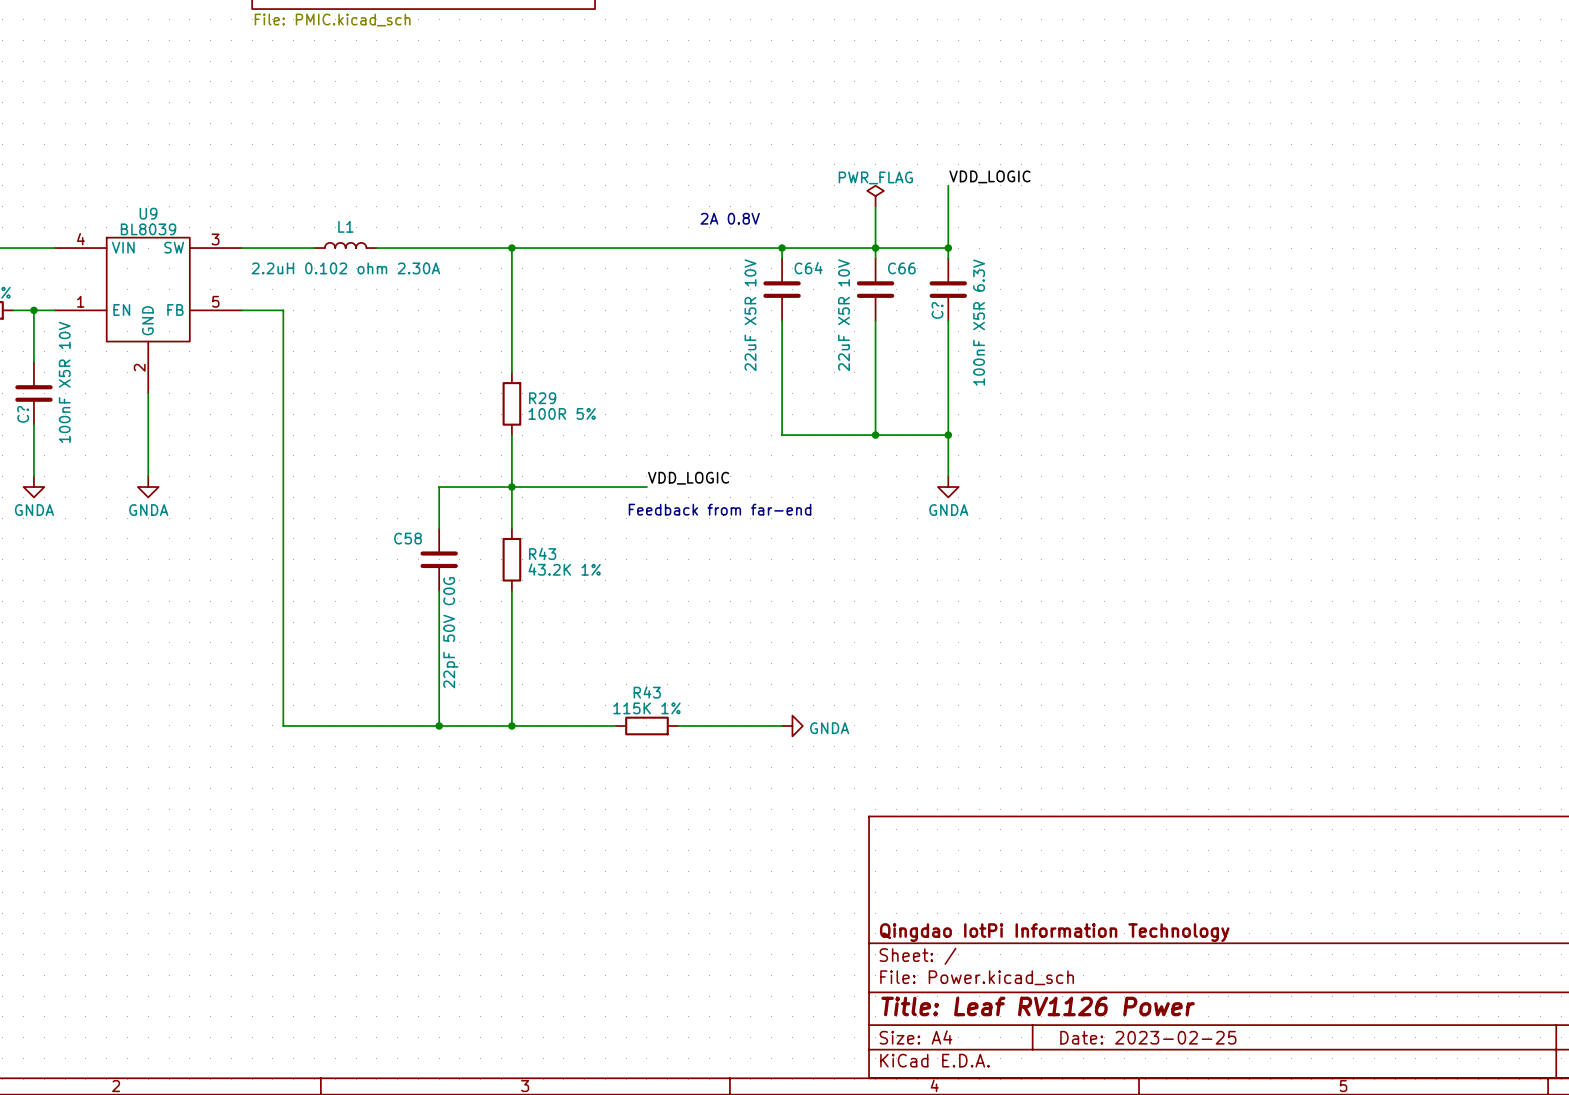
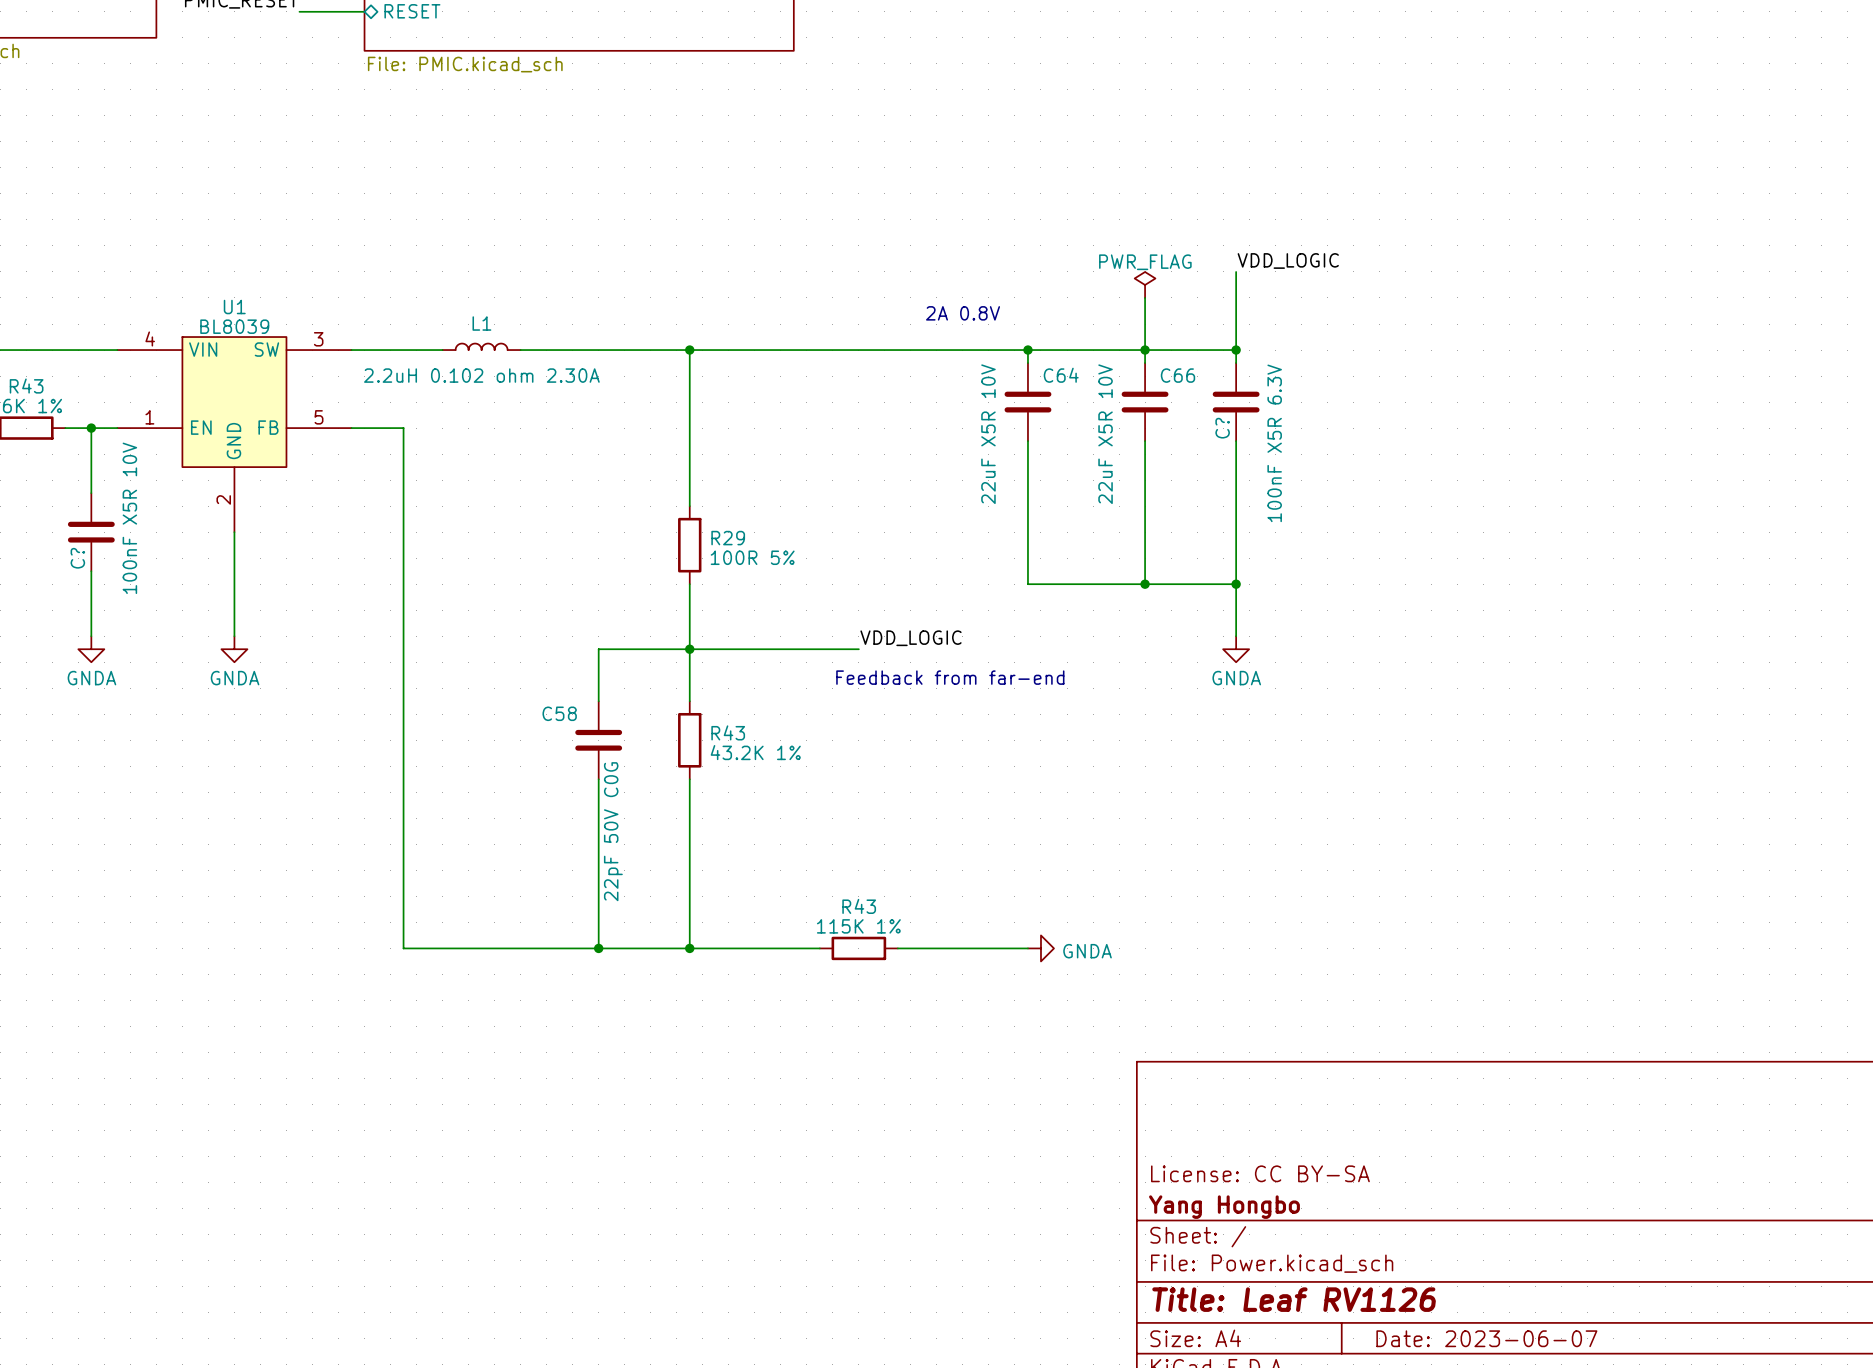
U9: BL8039 (148, 315) -> none
U1: none -> BL8039 (234, 434)
title block: none -> License: CC BY-SA (1260, 1173)
title block: Qingdao IotPi Information Technology (1054, 932) -> Yang Hongbo (1224, 1207)
title block: Title: Leaf RV1126 Power (1038, 1006) -> Title: Leaf RV1126 (1294, 1299)
title block: Date: 2023-02-25 (1148, 1037) -> Date: 2023-06-07 (1486, 1338)

